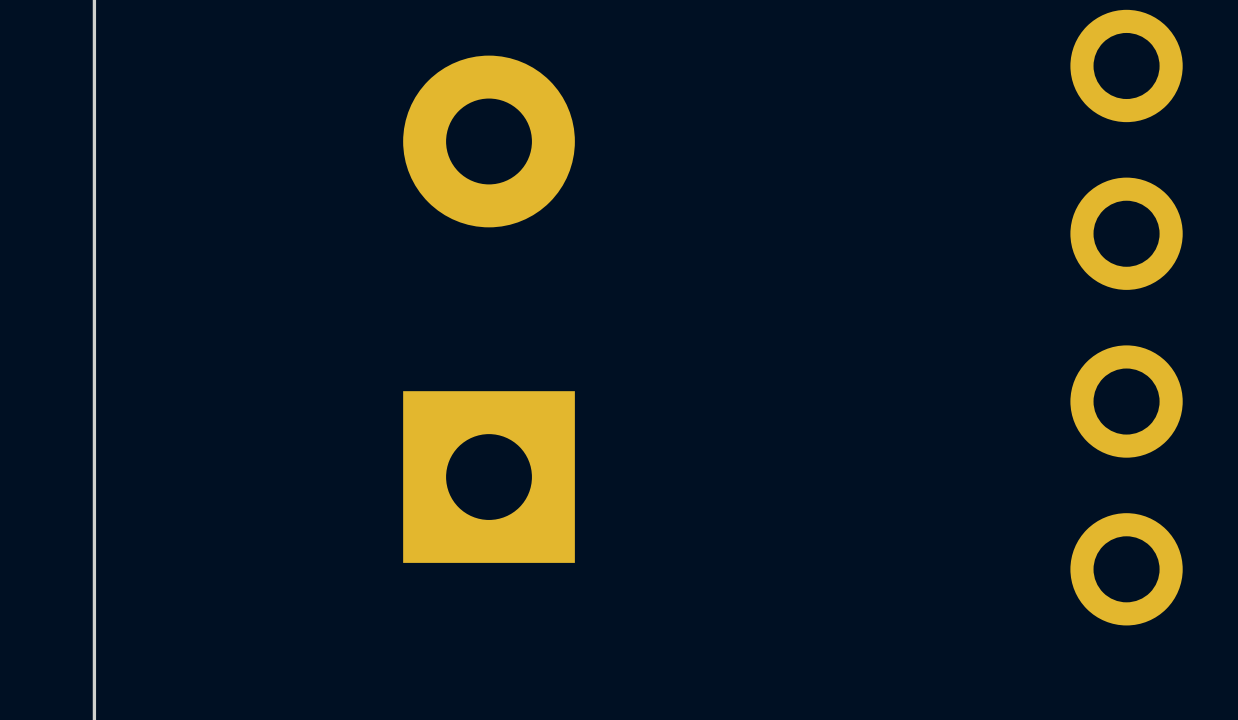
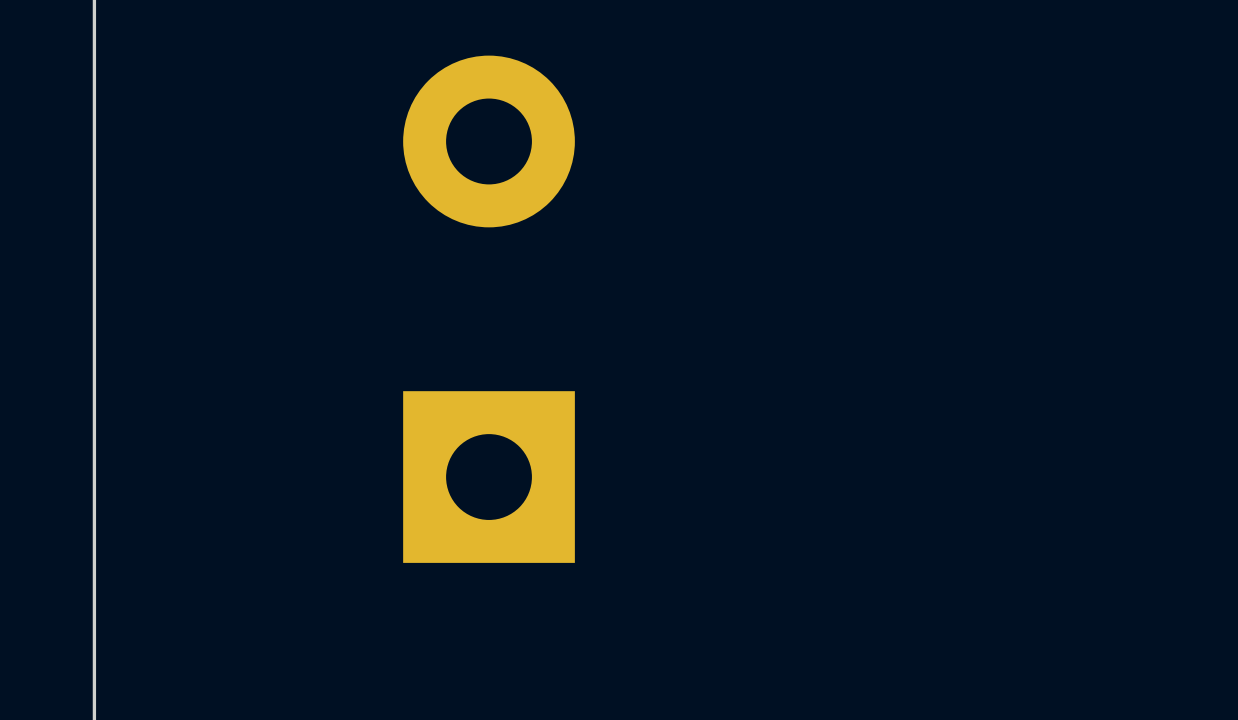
part: (1126, 317) -> none

